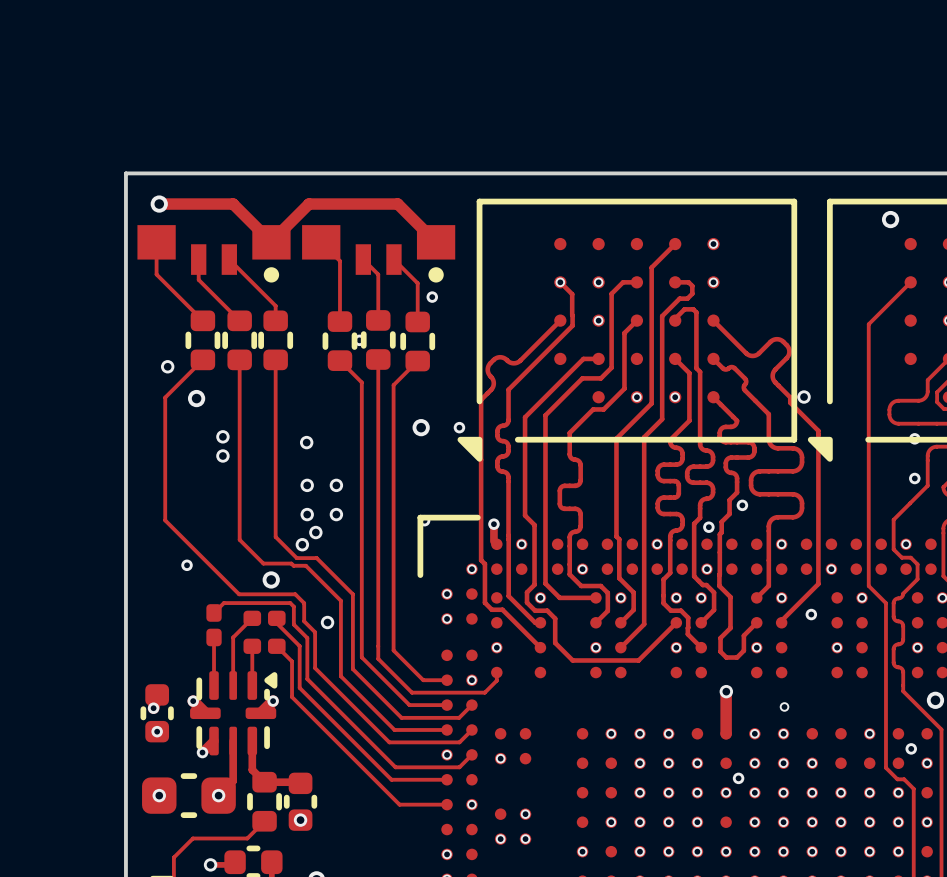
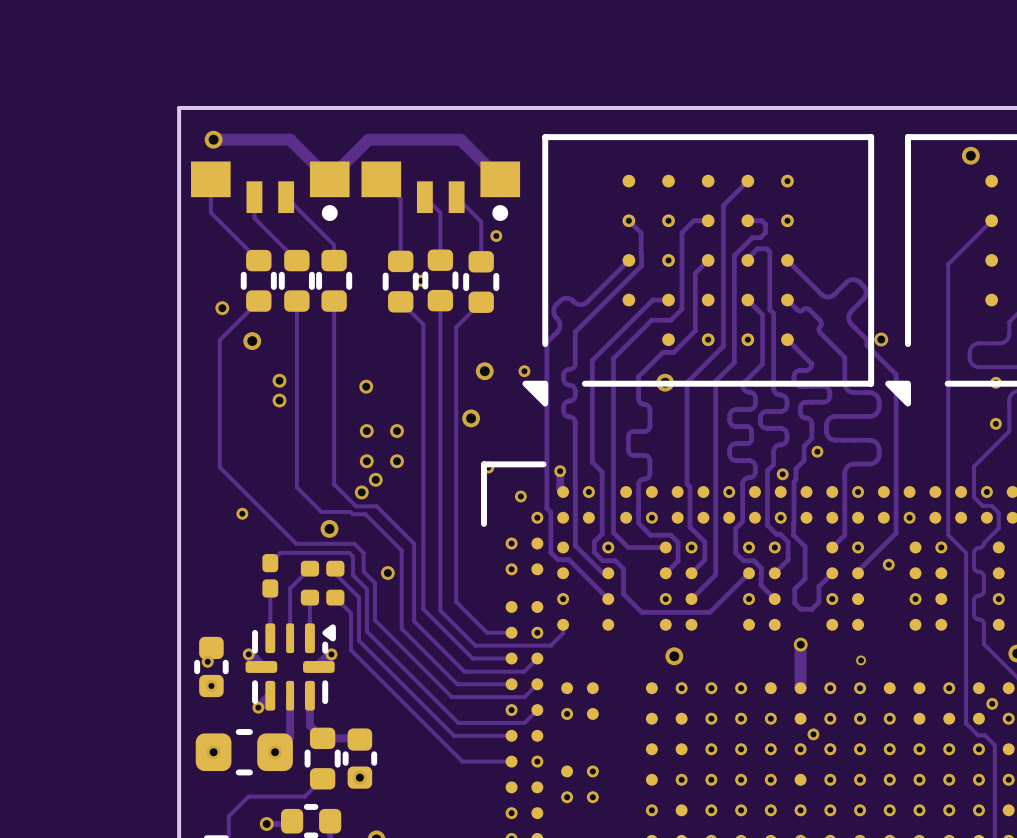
via: none -> (665, 382)
via: none -> (471, 418)
via: none -> (520, 496)
via: none -> (674, 656)

